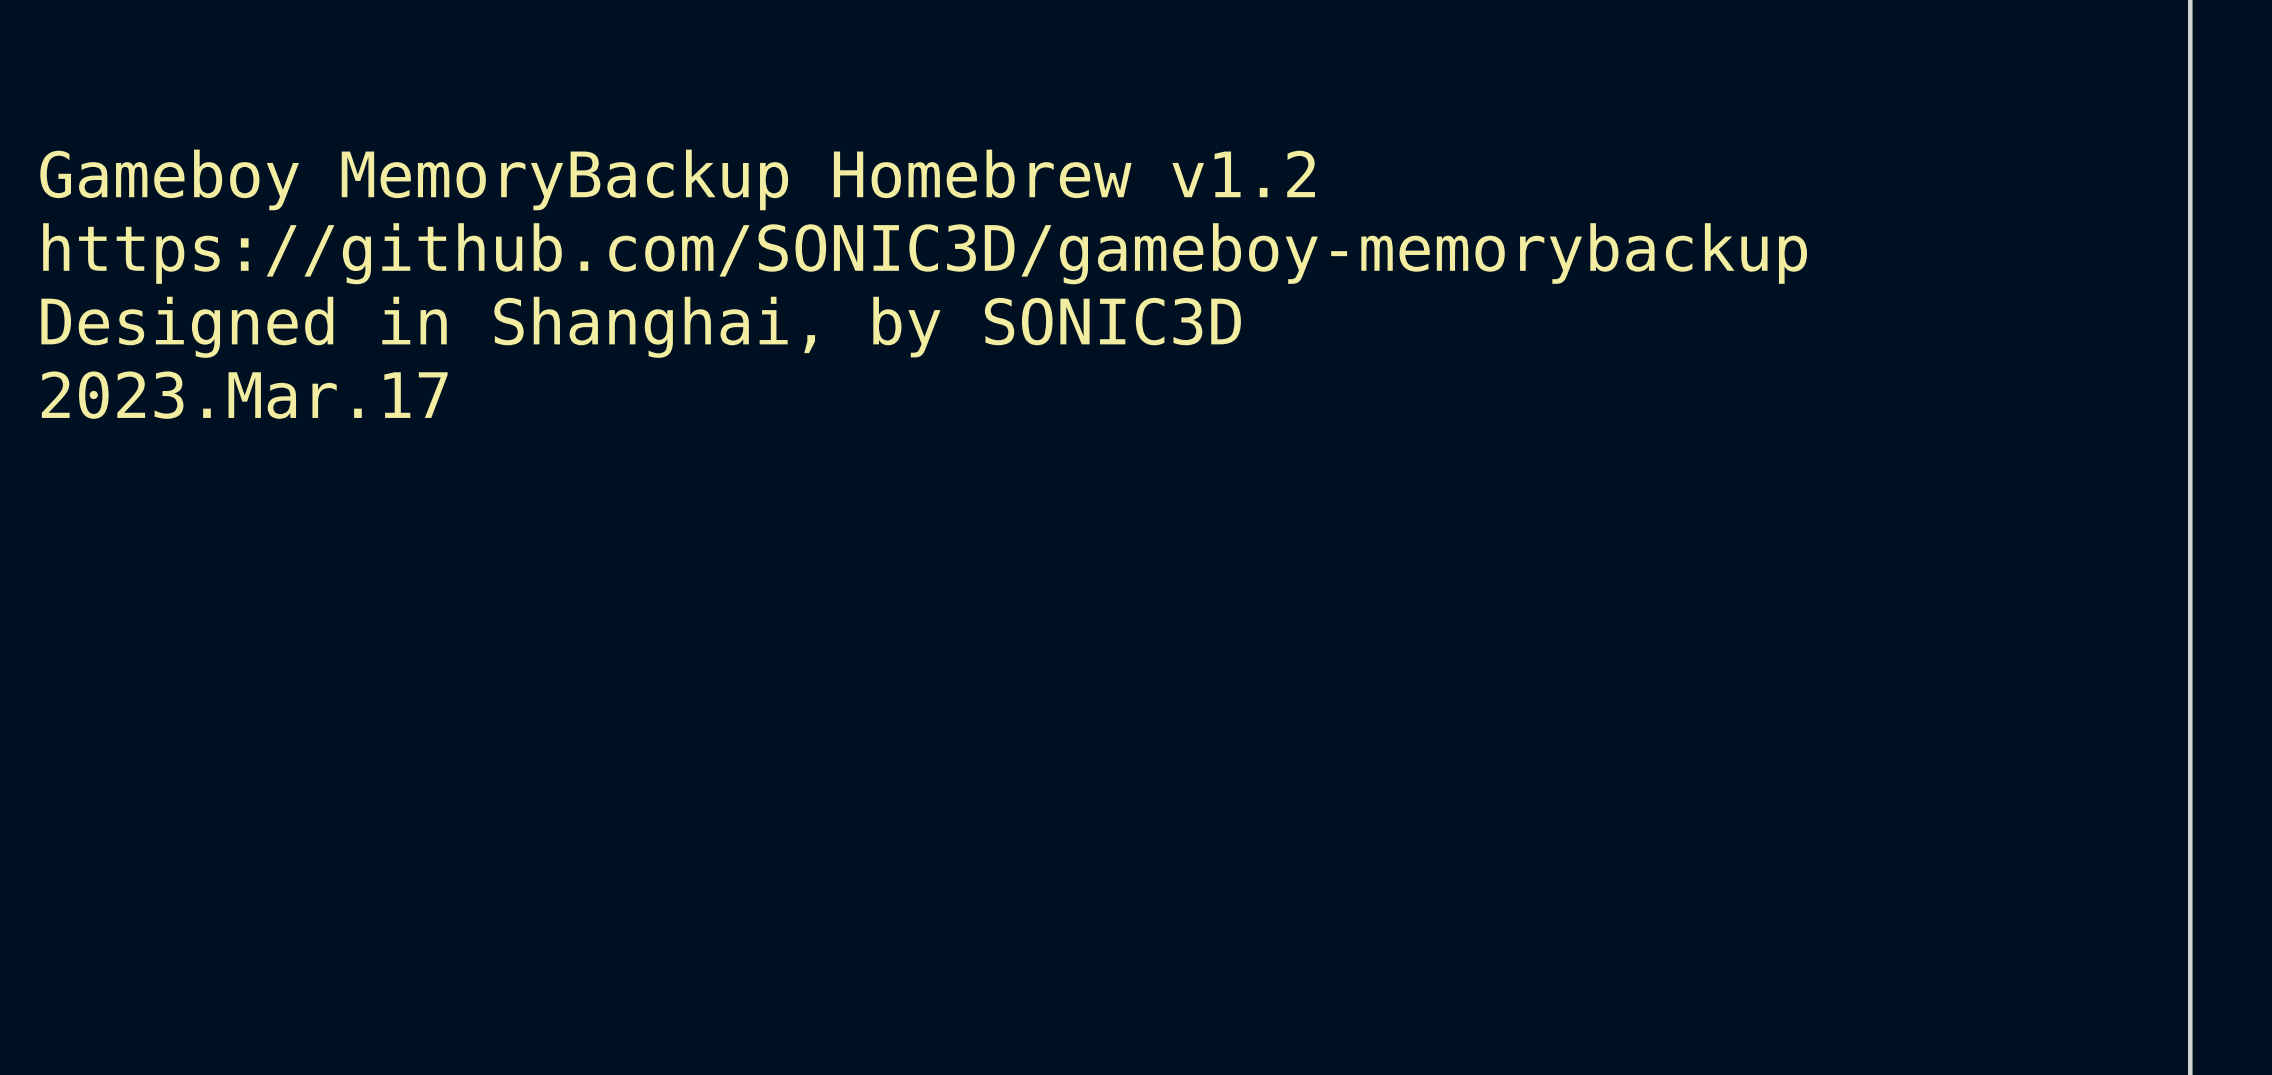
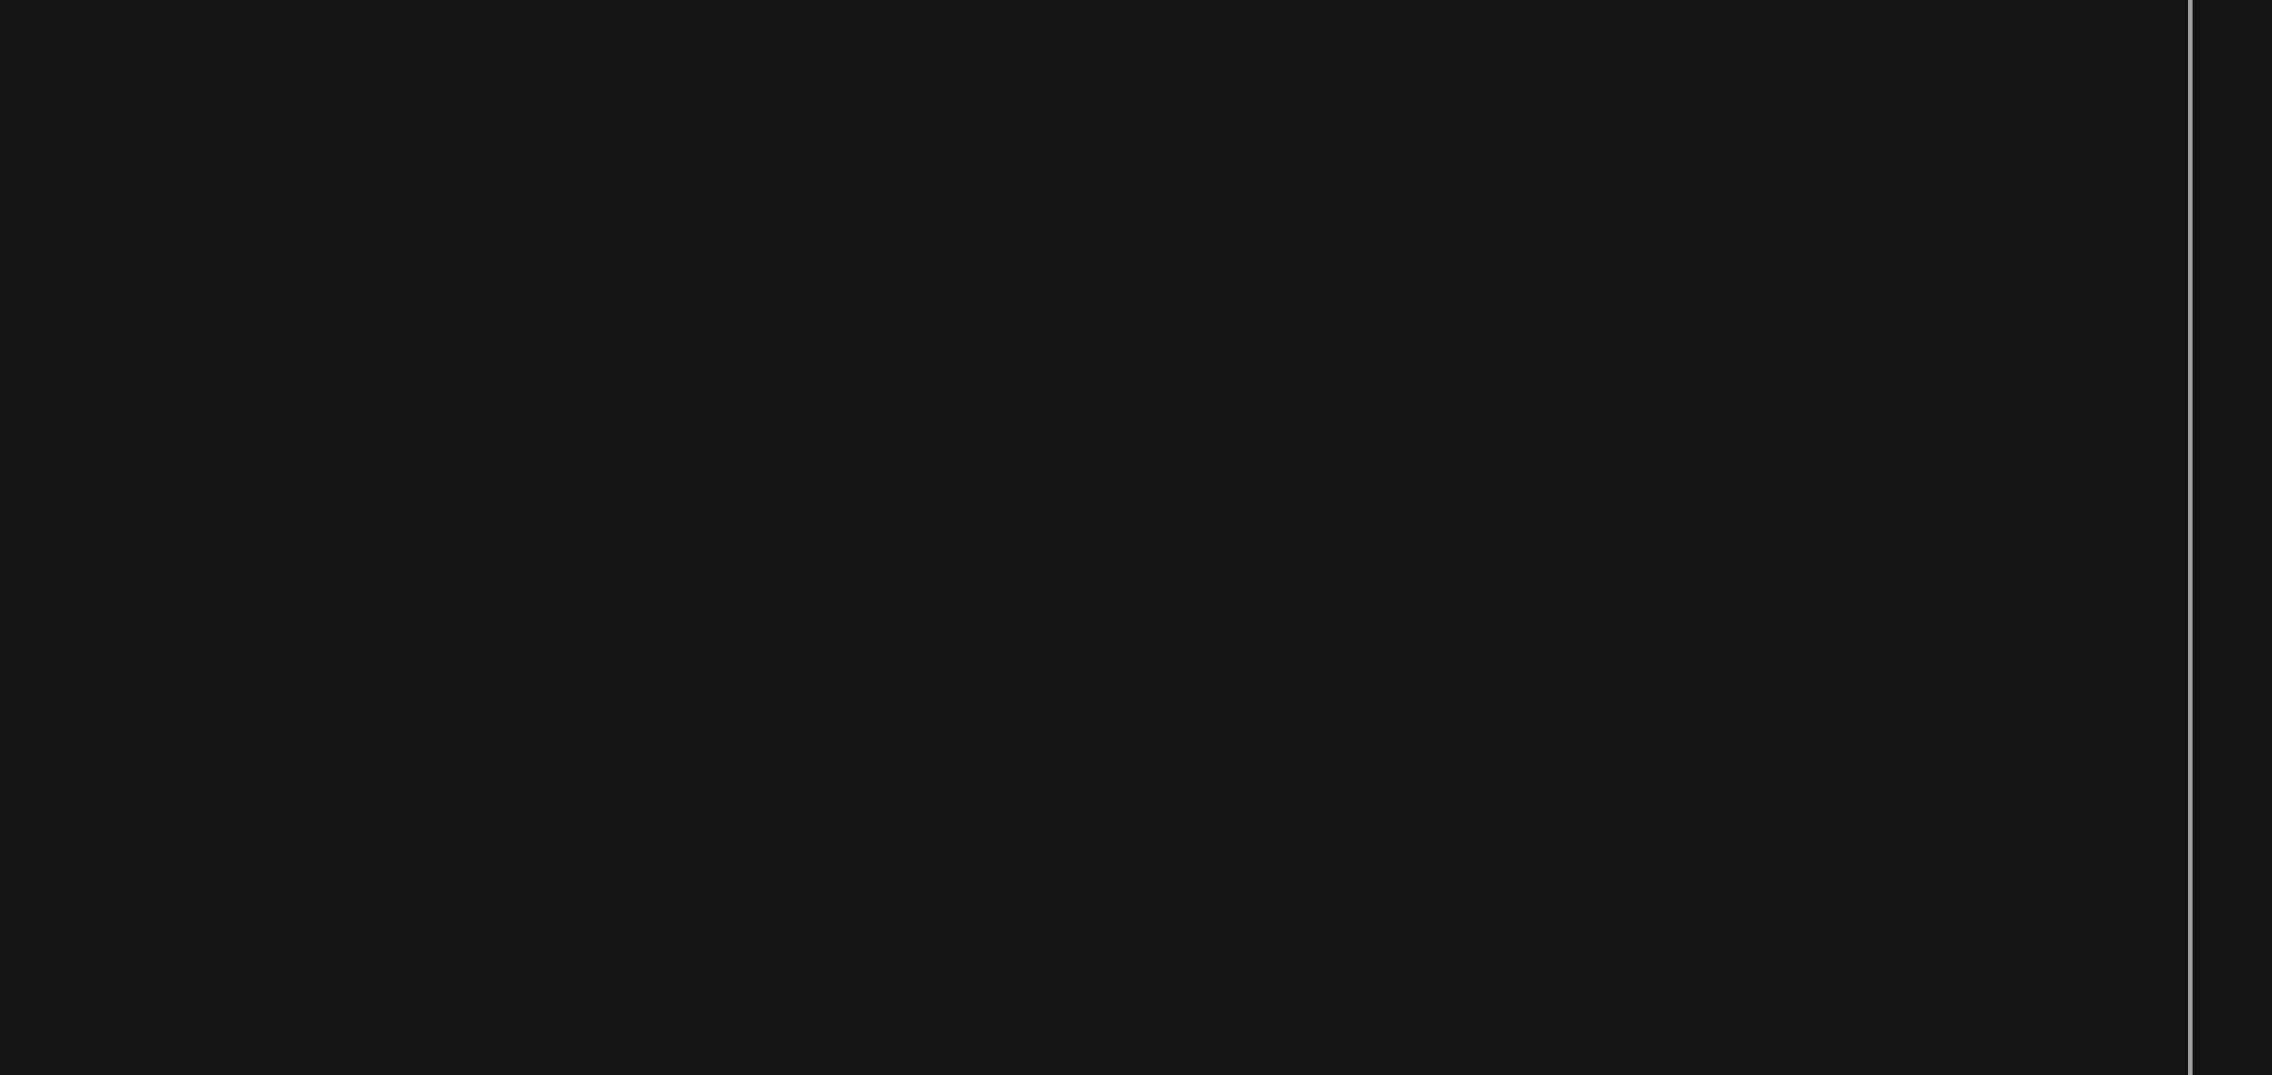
text: Gameboy MemoryBackup Homebrew v1.2 (677, 179) -> none
text: https://github.com/SONIC3D/gameboy-memorybackup (925, 253) -> none
text: Designed in Shanghai, by SONIC3D (641, 327) -> none
text: 2023.Mar.17 (244, 395) -> none

